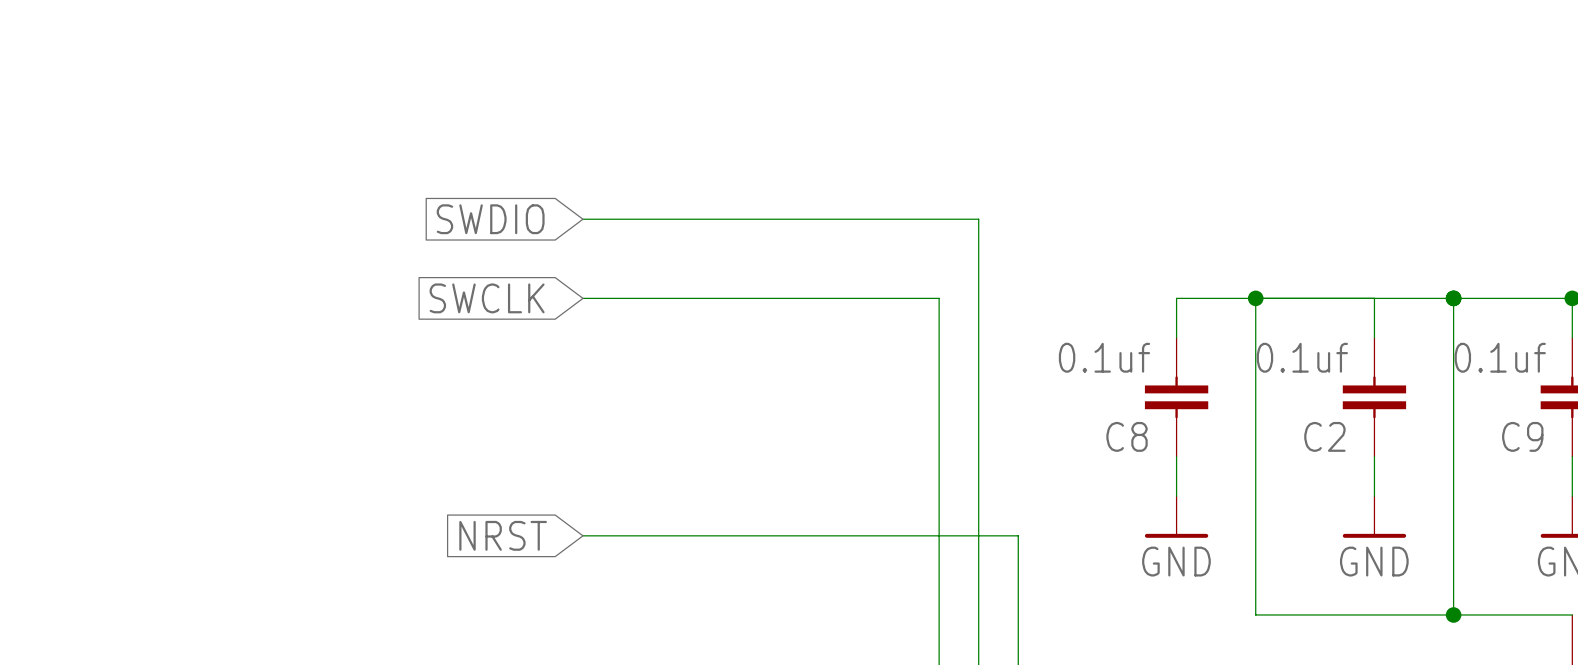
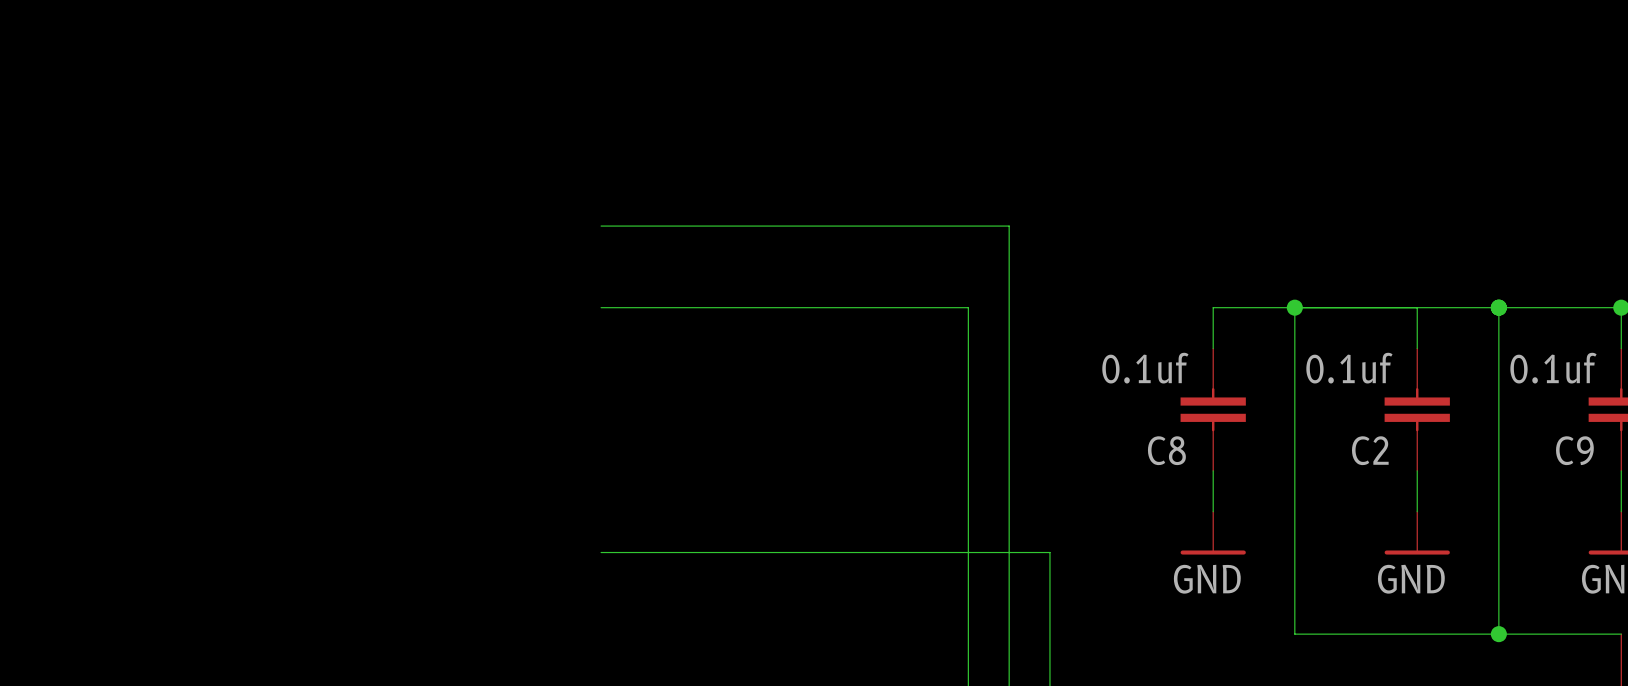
global label: SWDIO (490, 219) -> none
global label: SWCLK (487, 298) -> none
global label: NRST (503, 535) -> none

